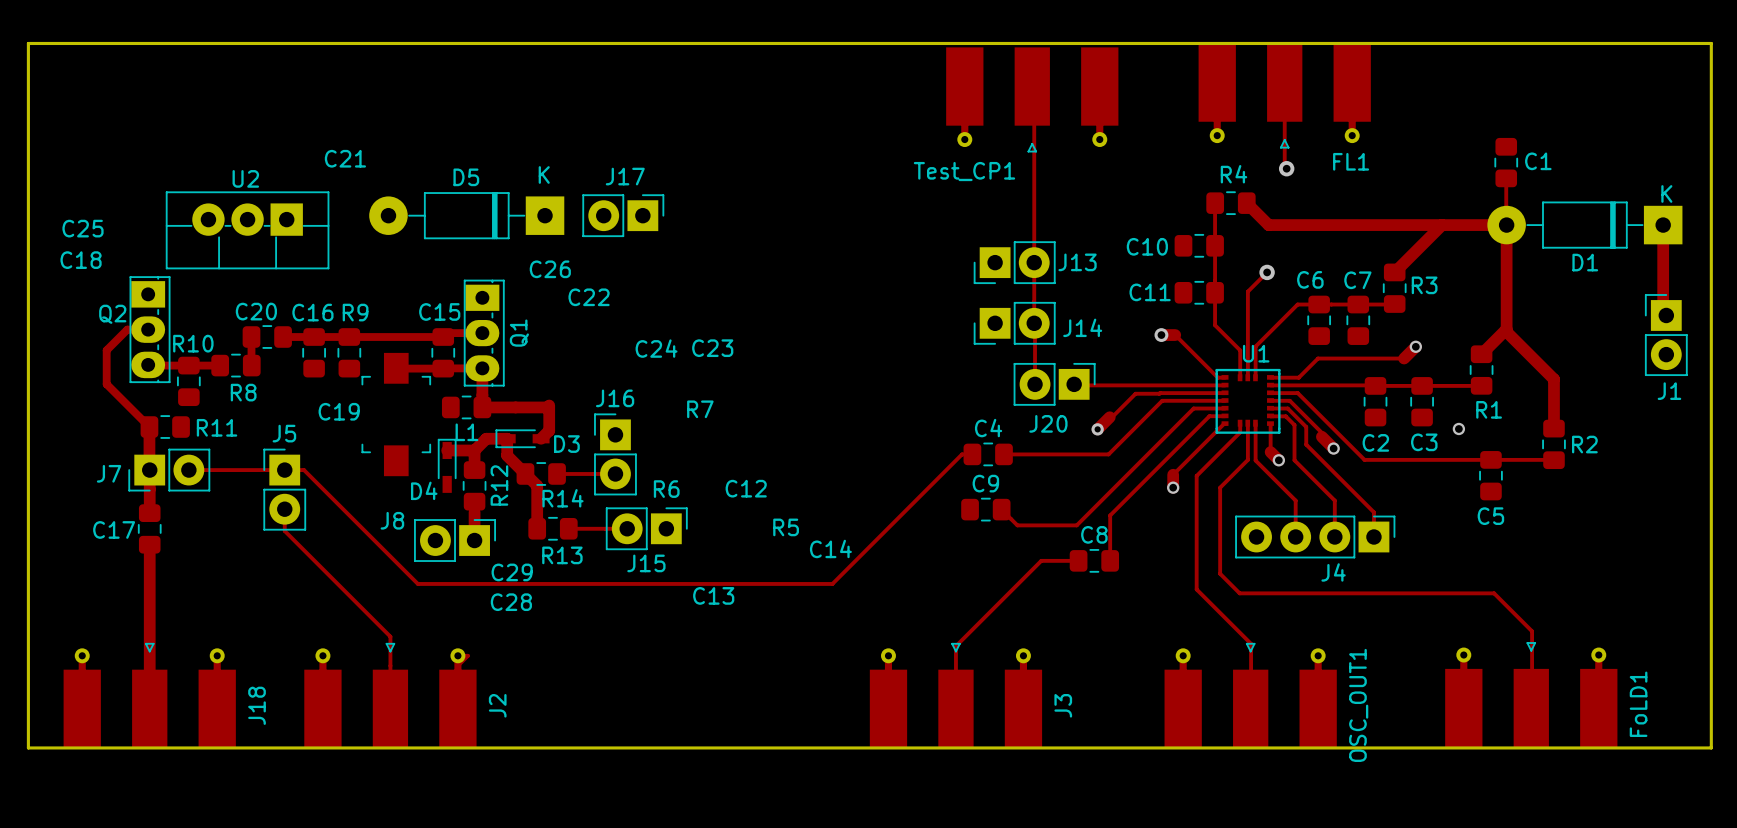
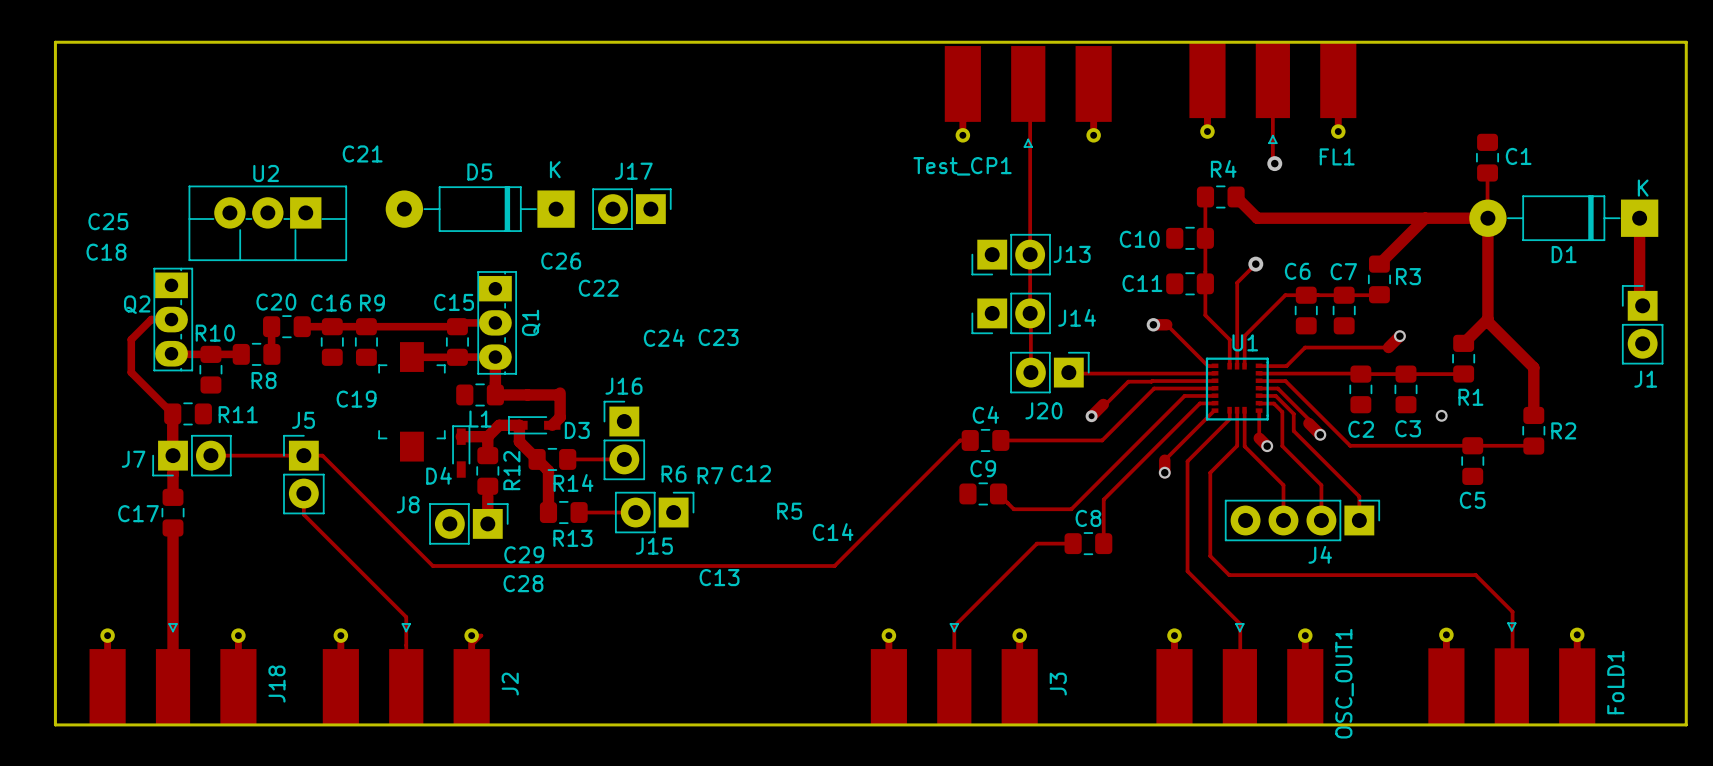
R7 position: (700, 409) -> (710, 475)

